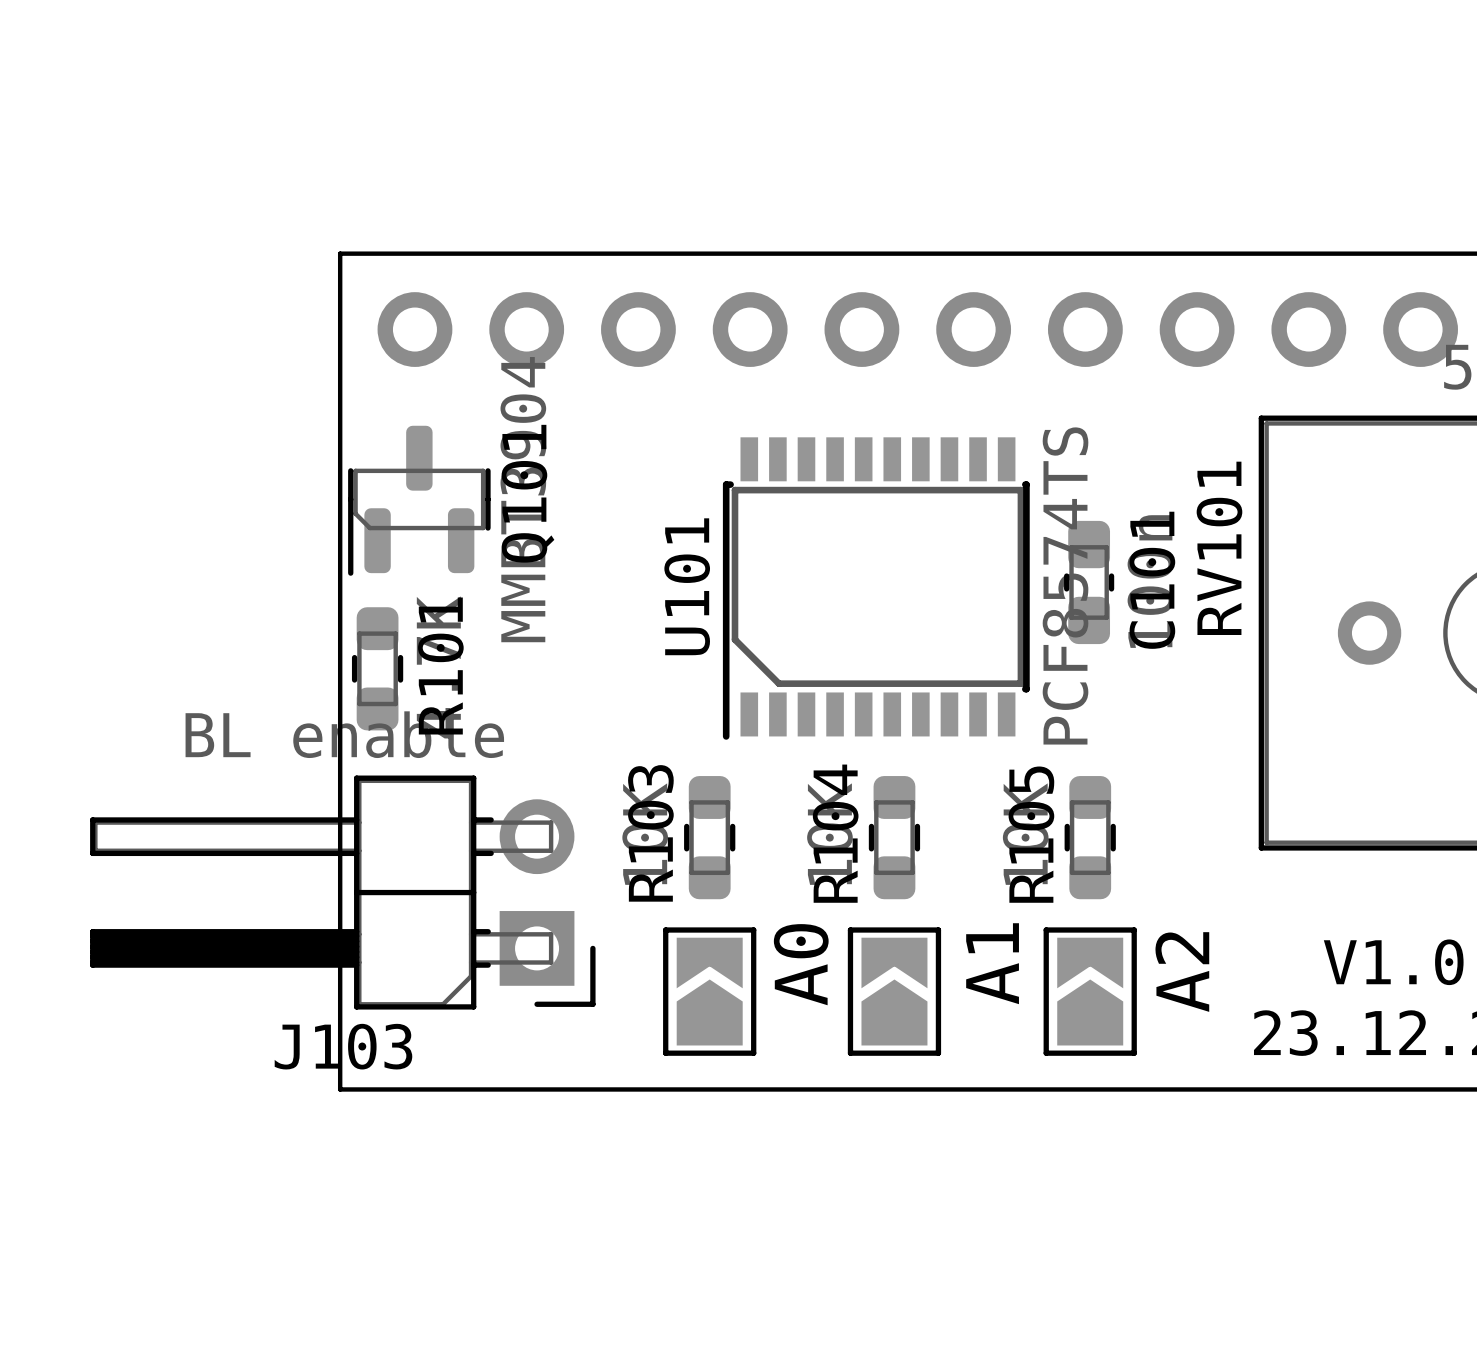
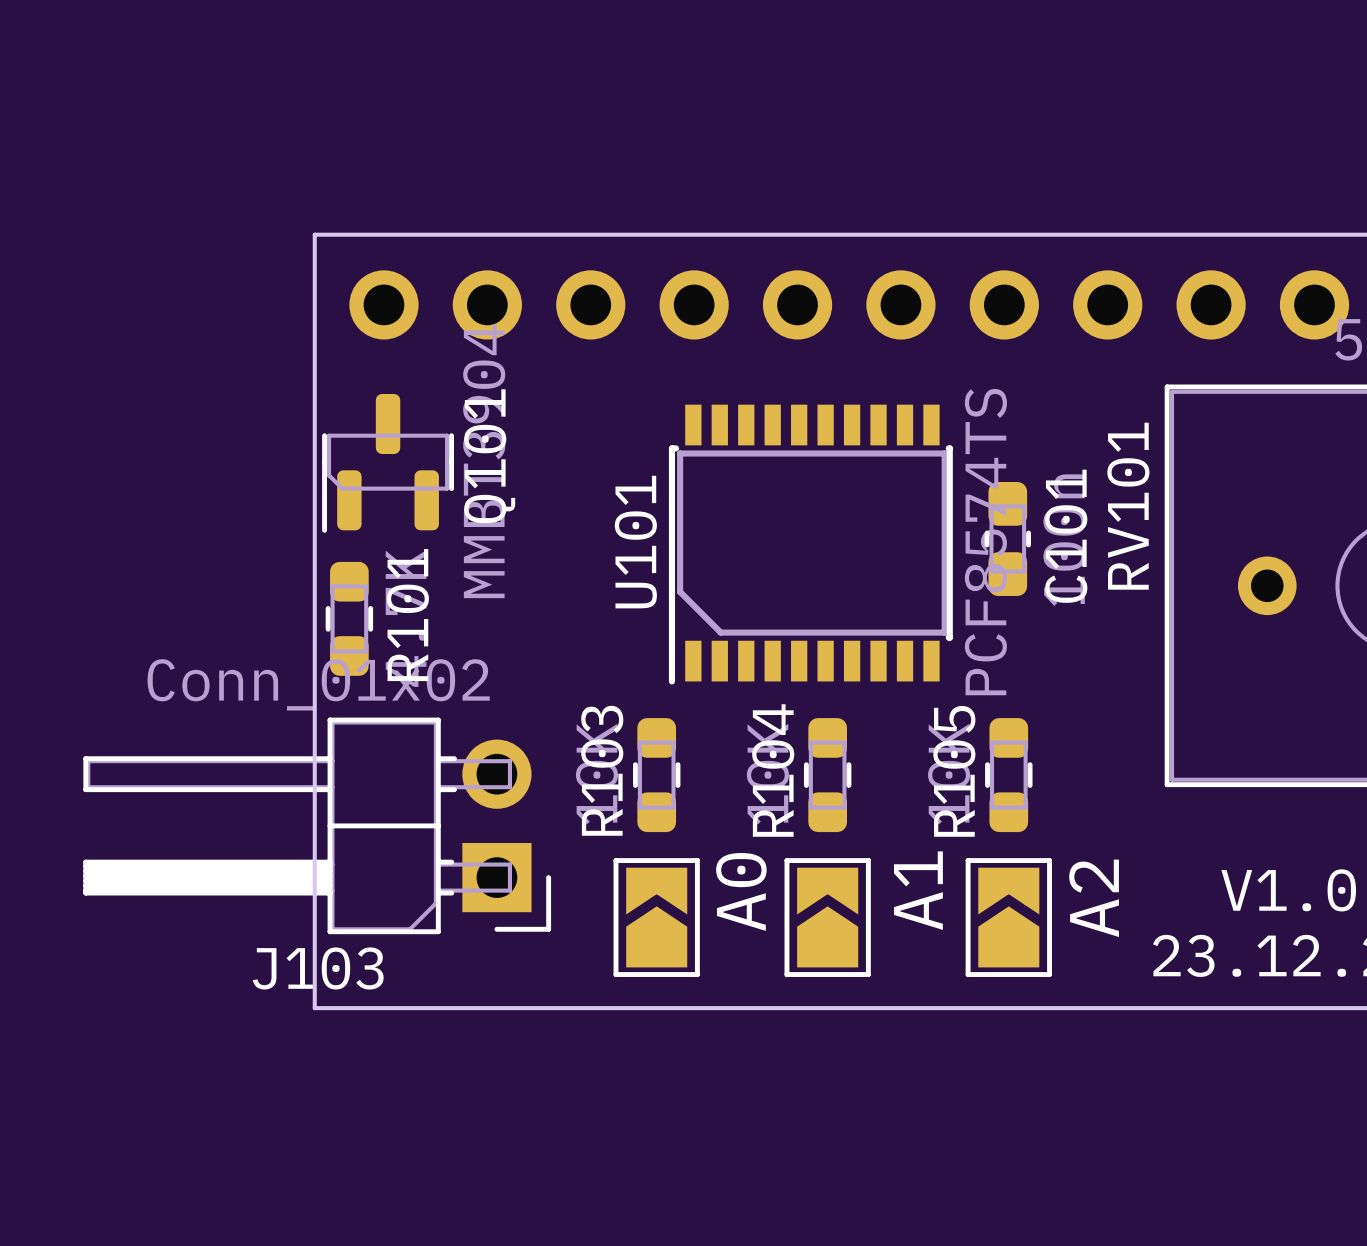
J103 value: BL enable (344, 734) -> Conn_01x02 (318, 684)

